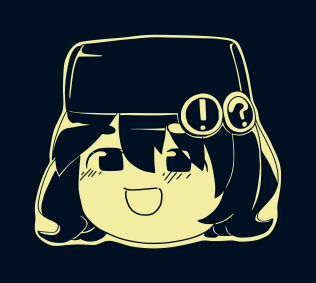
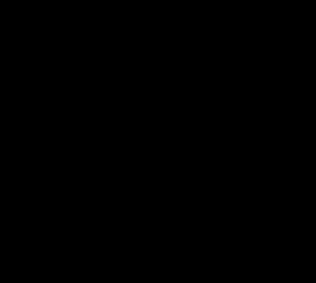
drawing: [34, 34, 282, 249] -> none

